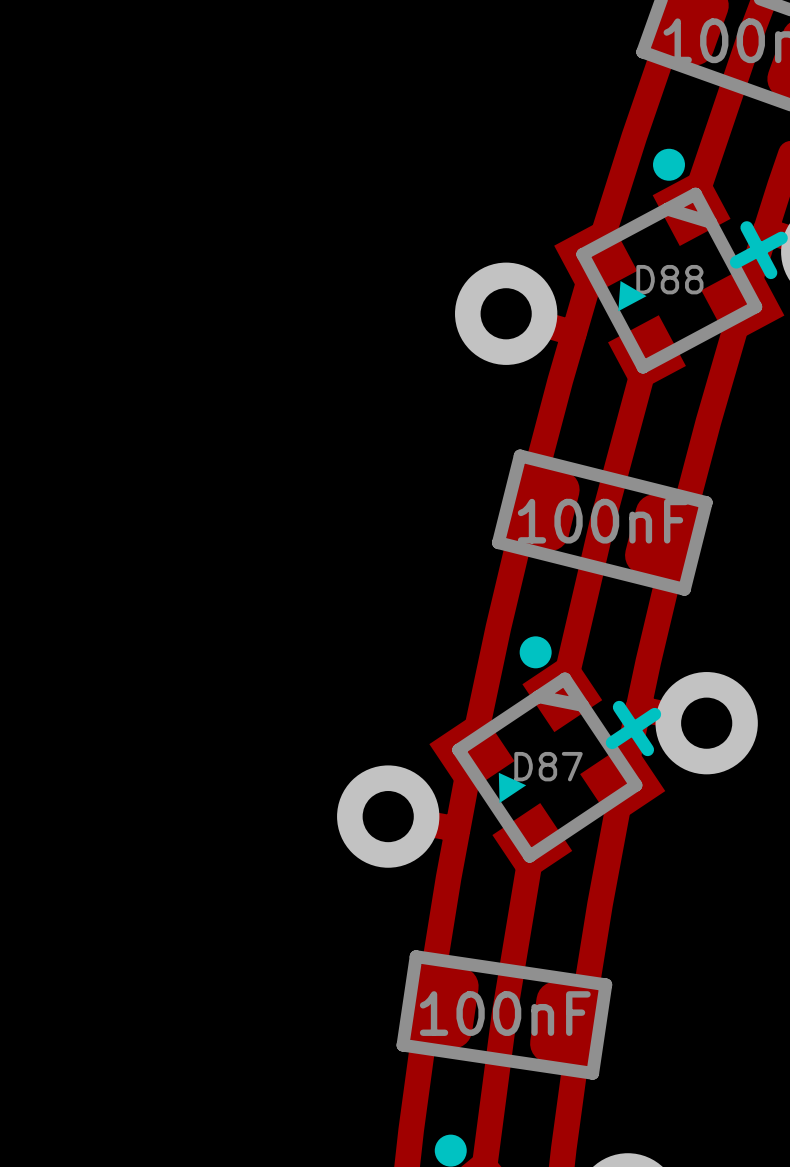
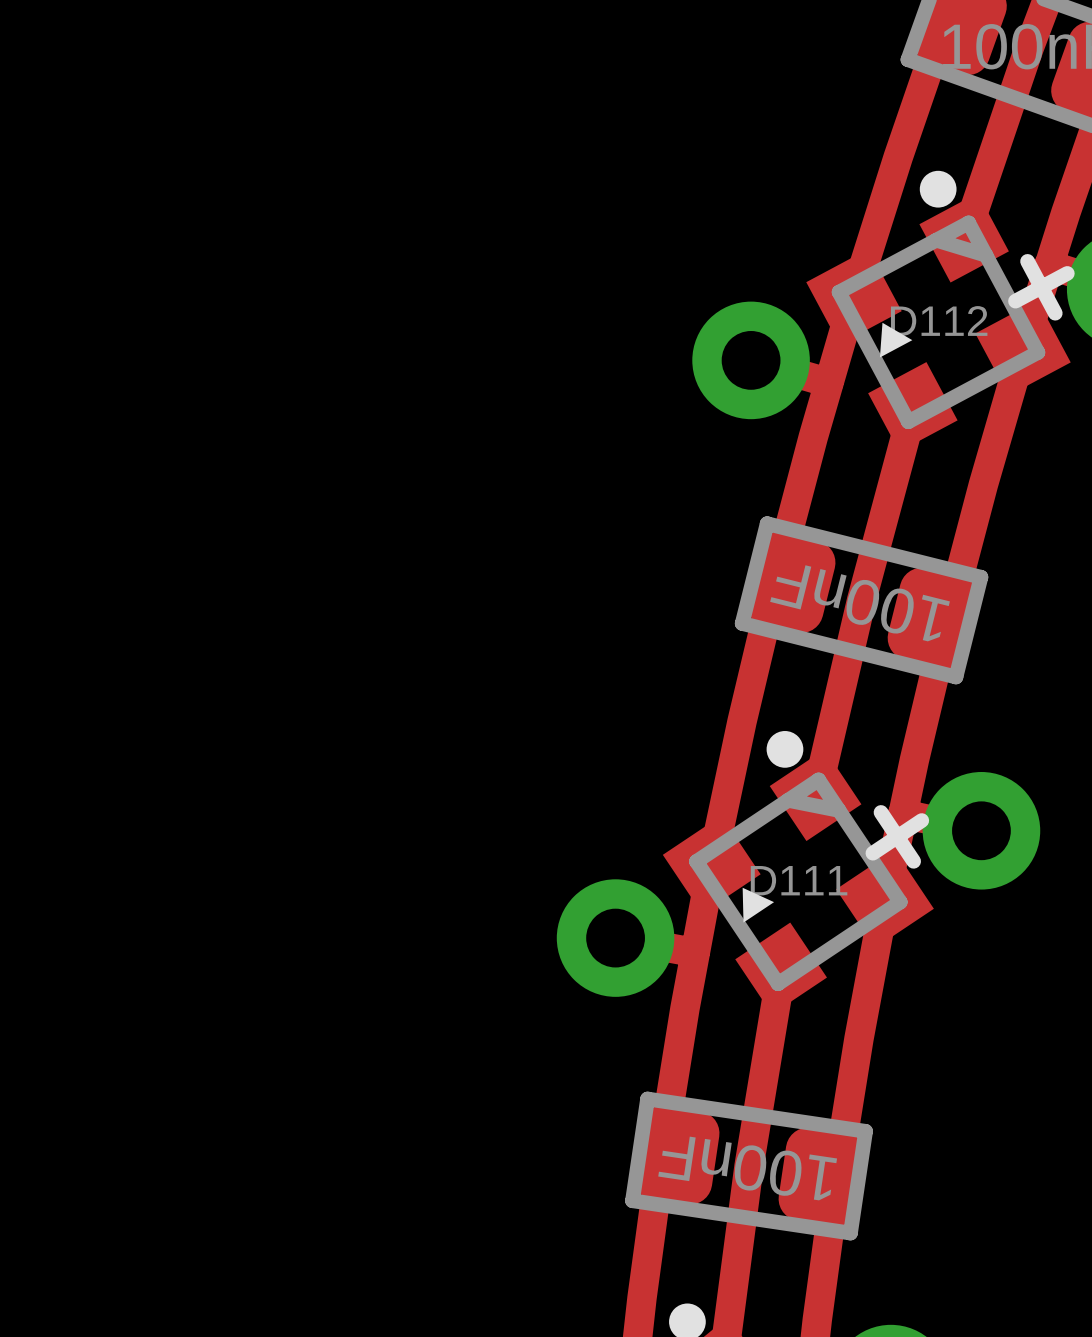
D88 name: D88 (669, 279) -> D112 (939, 320)
part value rotation: 0° (603, 521) -> 165.9° counterclockwise (860, 603)
D87 name: D87 (548, 766) -> D111 (799, 880)
part value rotation: 0° (505, 1013) -> 171.6° counterclockwise (747, 1168)

